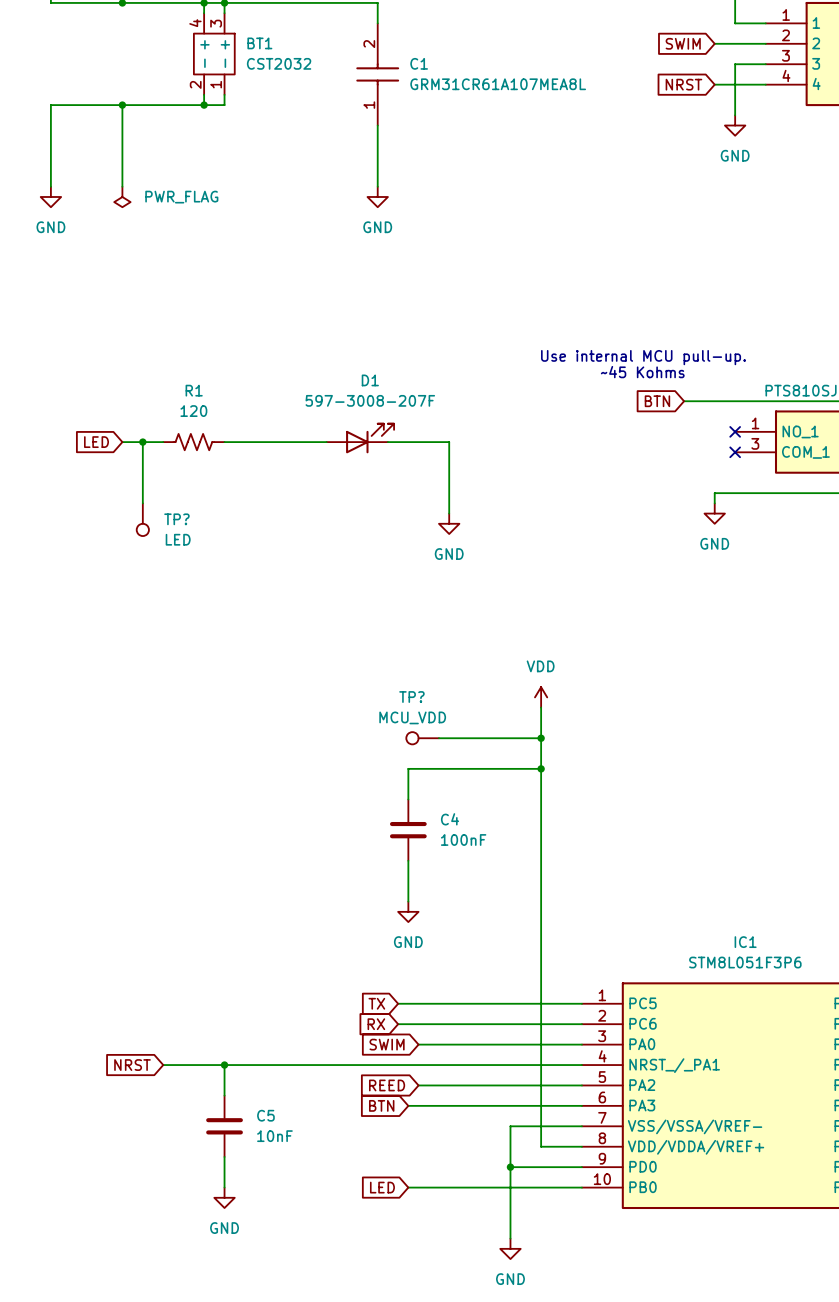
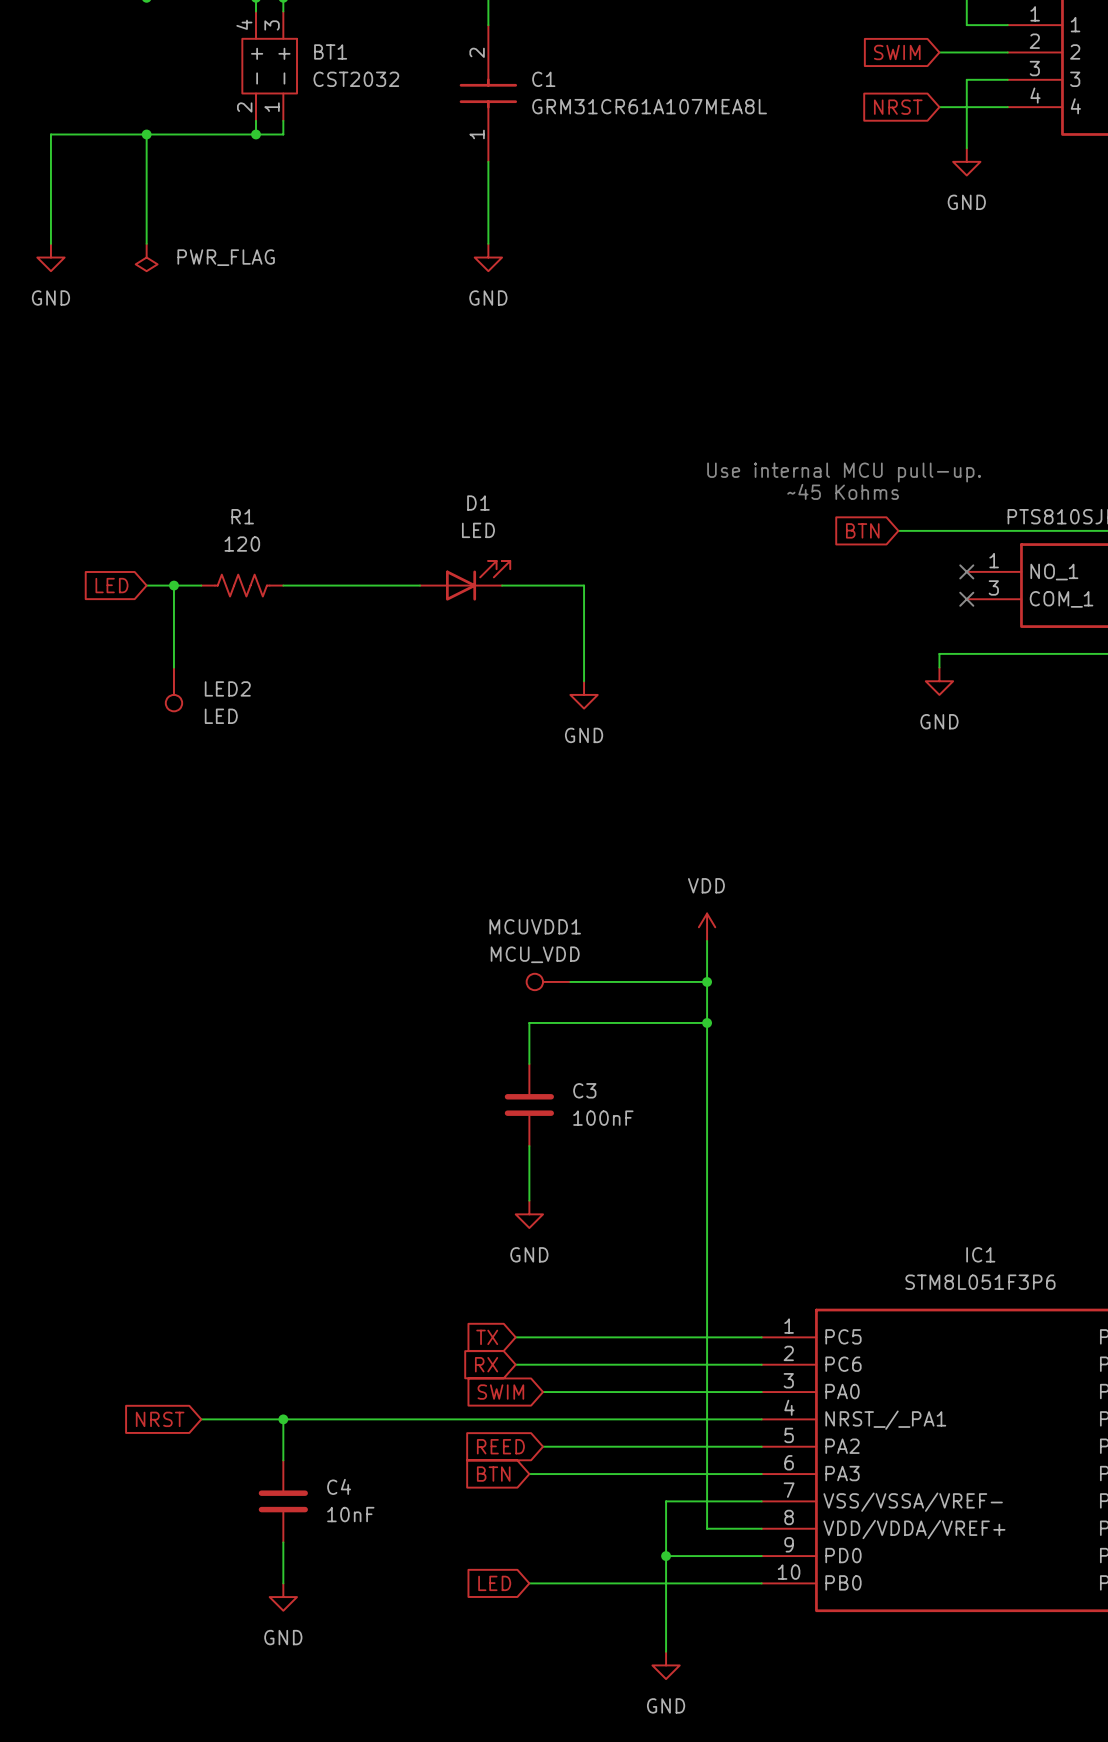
D1 value: 597-3008-207F (370, 400) -> LED (478, 530)
TP? name: TP? (176, 519) -> LED2 (227, 688)
TP? name: TP? (411, 697) -> MCUVDD1 (535, 926)
C4 name: C4 (450, 819) -> C3 (584, 1090)
C5 name: C5 (265, 1115) -> C4 (339, 1486)

